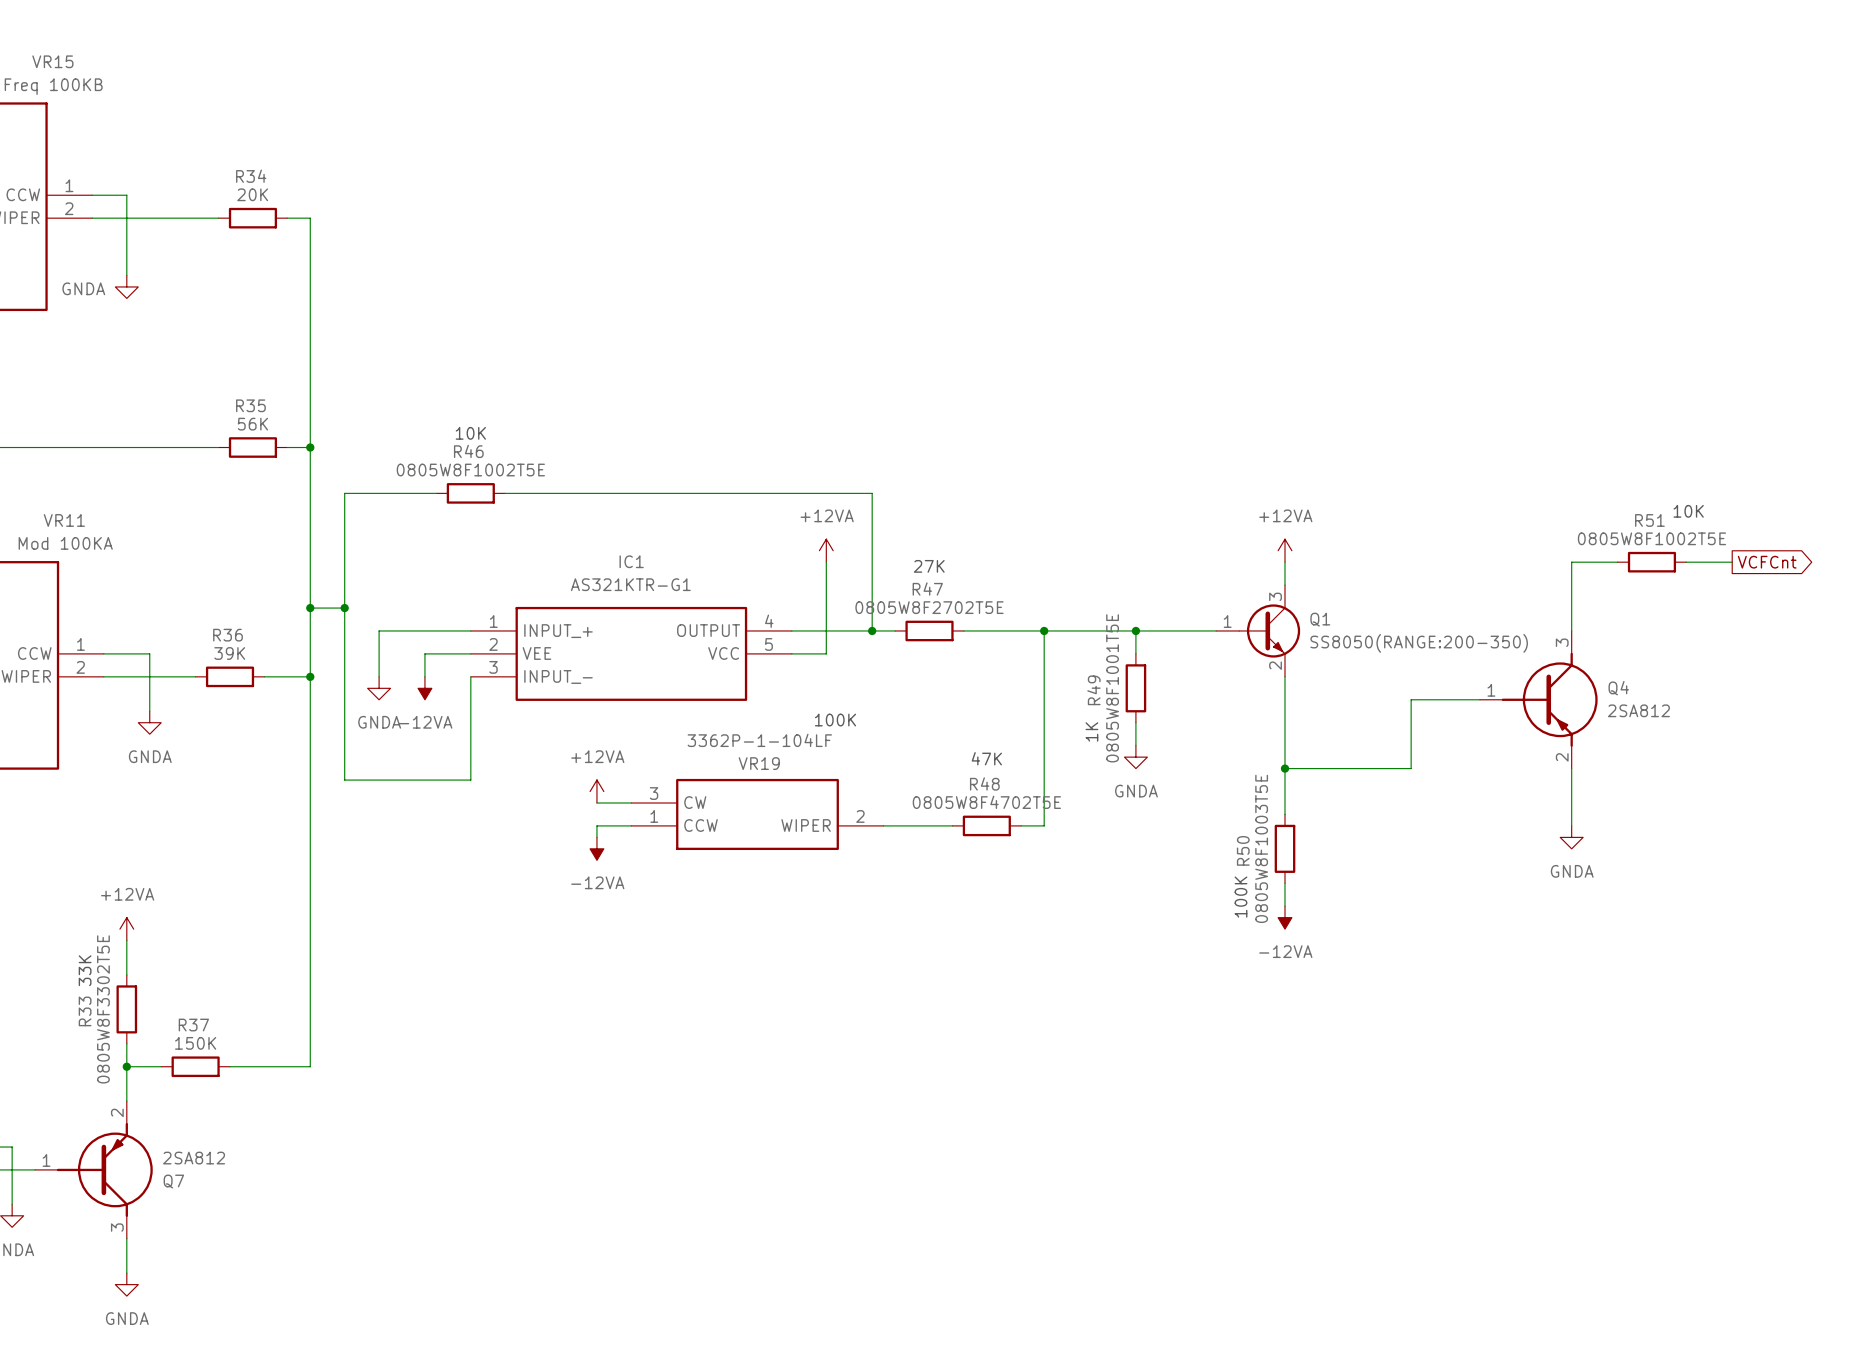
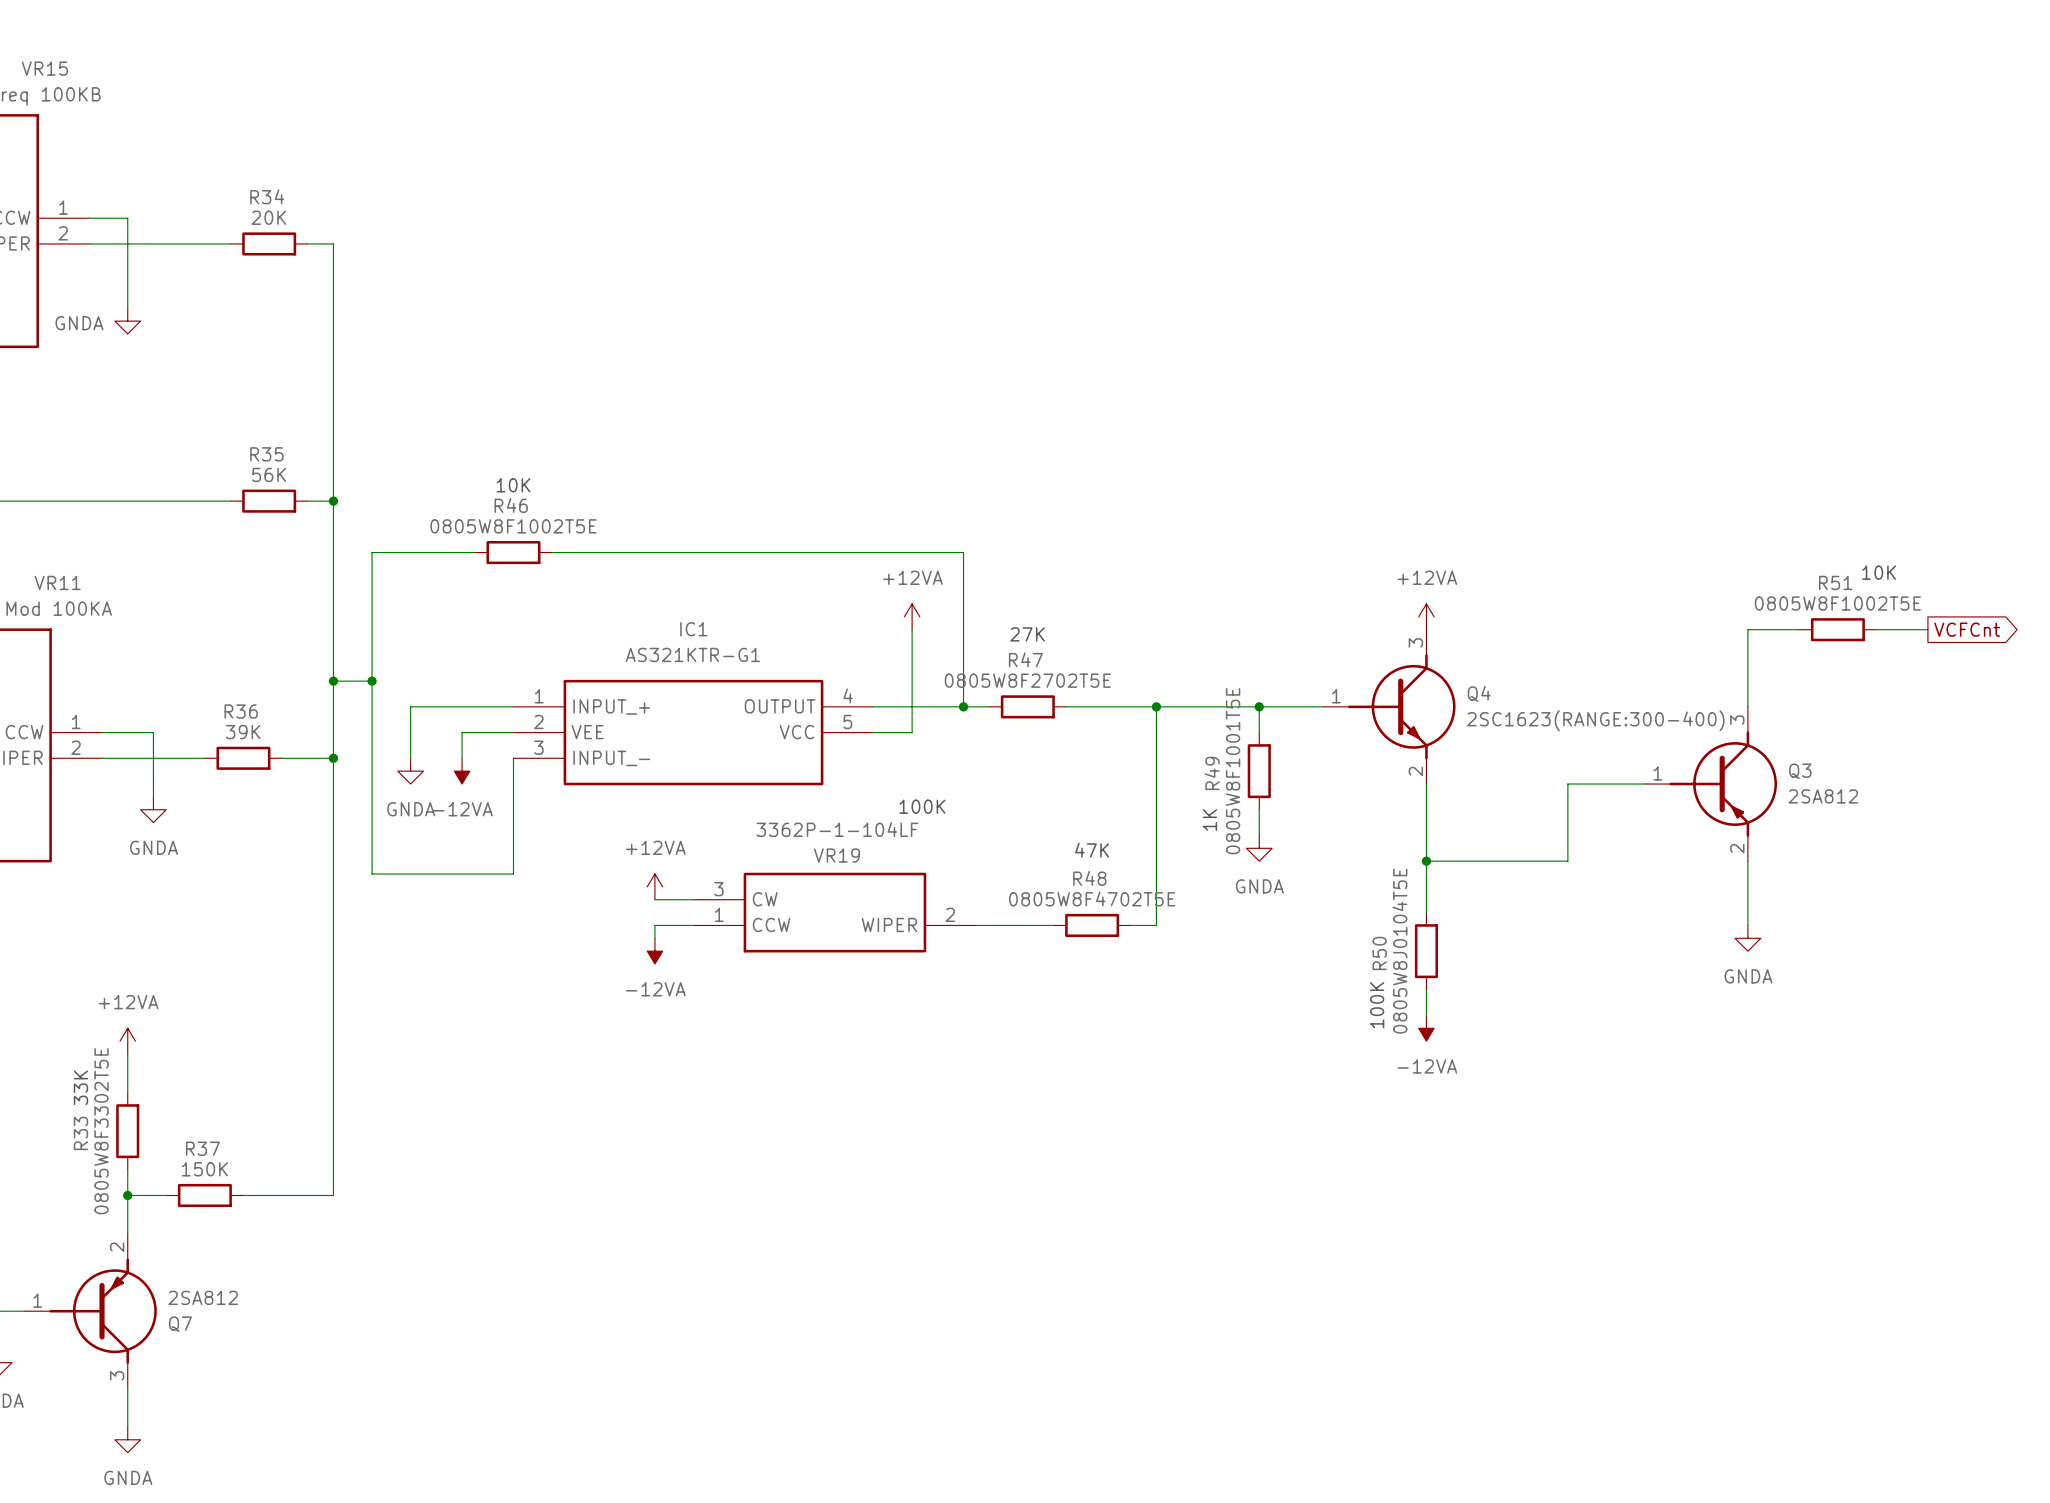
Q4: none -> 2SC1623(RANGE:300-400) (1389, 706)
Q1: SS8050(RANGE:200-350) (1258, 630) -> none
Q4 name: Q4 (1618, 688) -> Q3 (1800, 771)
R50 value: 0805W8F1003T5E (1261, 848) -> 0805W8J0104T5E (1399, 951)

